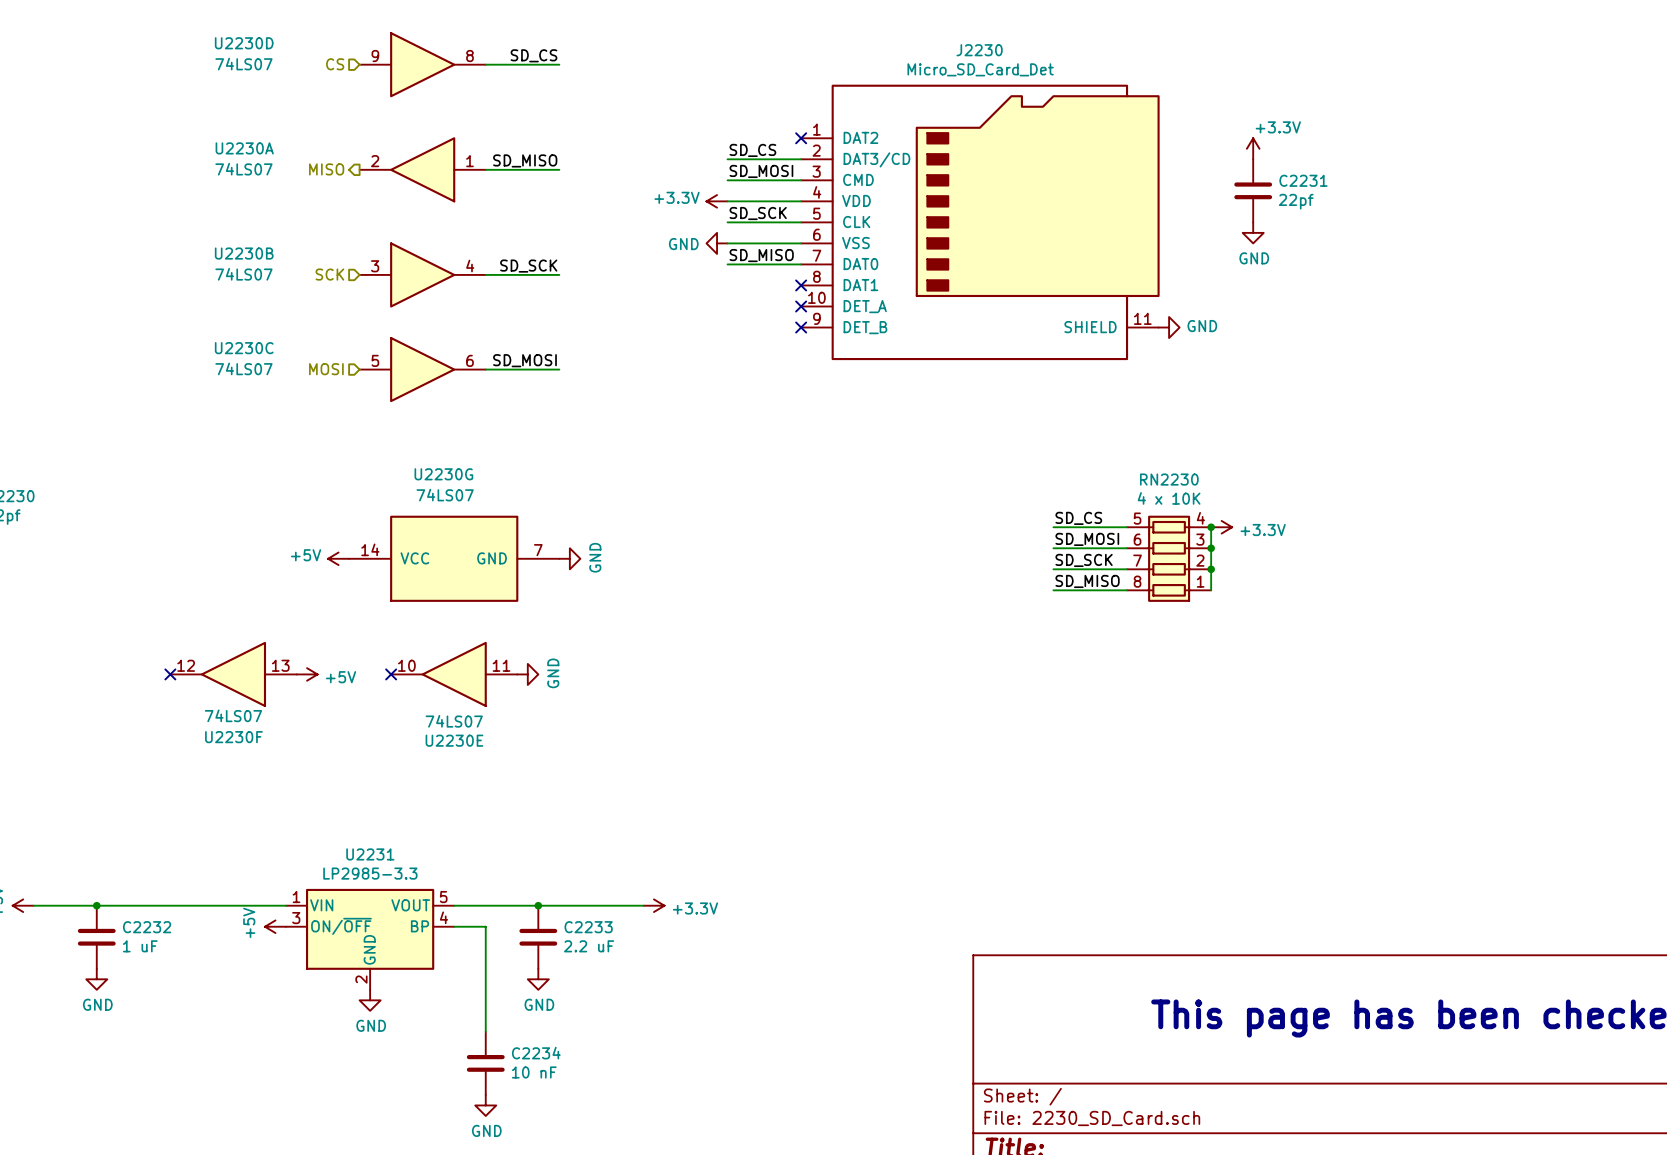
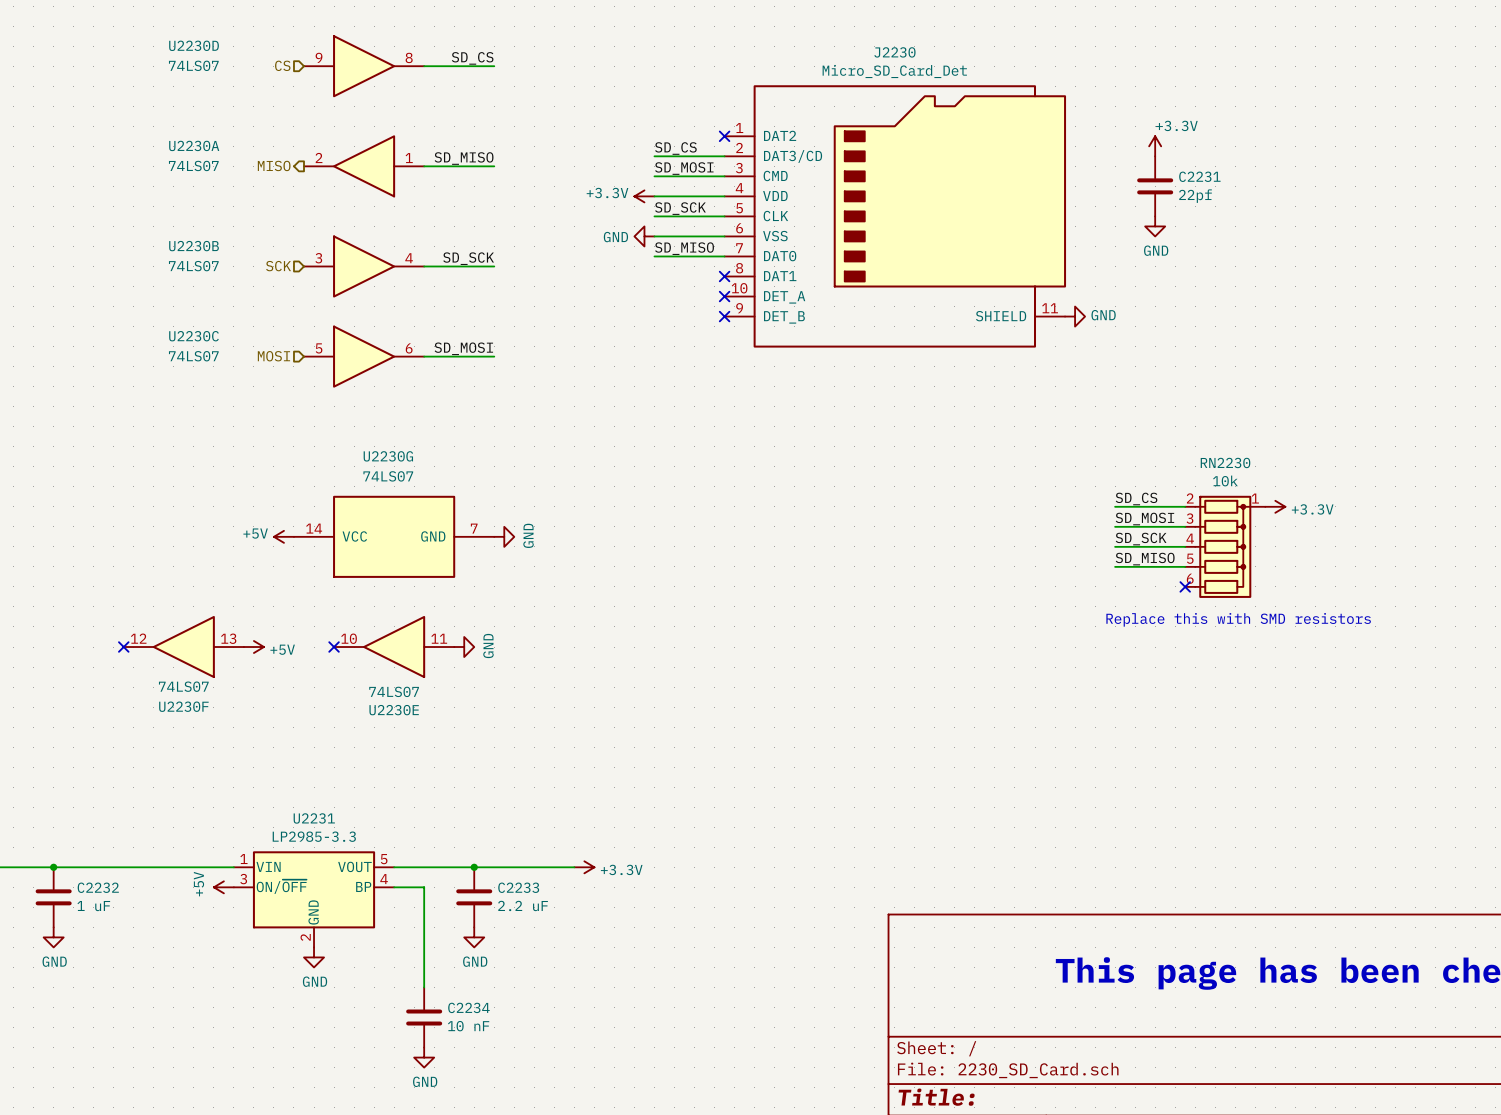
RN2230 value: 4 x 10K (1169, 498) -> 10k (1225, 480)
RN2230 symbol: [1127, 515, 1212, 602] -> [1185, 495, 1266, 598]
label position: SD_CS (1078, 518) -> SD_CS (1136, 499)
wire: (1053, 527) (1127, 527) -> none
wire: (1211, 527) (1211, 590) -> (1115, 506) (1185, 506)
junction: (1211, 527) -> none
power symbol position: +3.3V (1221, 527) -> +3.3V (1275, 506)
label position: SD_MOSI (1087, 539) -> SD_MOSI (1144, 519)
wire: (1053, 548) (1127, 548) -> (1115, 526) (1185, 526)
junction: (1211, 548) -> none
label position: SD_SCK (1084, 560) -> SD_SCK (1141, 539)
wire: (1053, 569) (1127, 569) -> (1115, 546) (1185, 546)
junction: (1211, 569) -> none
label position: SD_MISO (1087, 581) -> SD_MISO (1145, 559)
wire: (1053, 590) (1127, 590) -> (1115, 566) (1185, 566)
no-connect mark: none -> (1185, 586)
text: none -> Replace this with SMD resistors (1238, 619)

